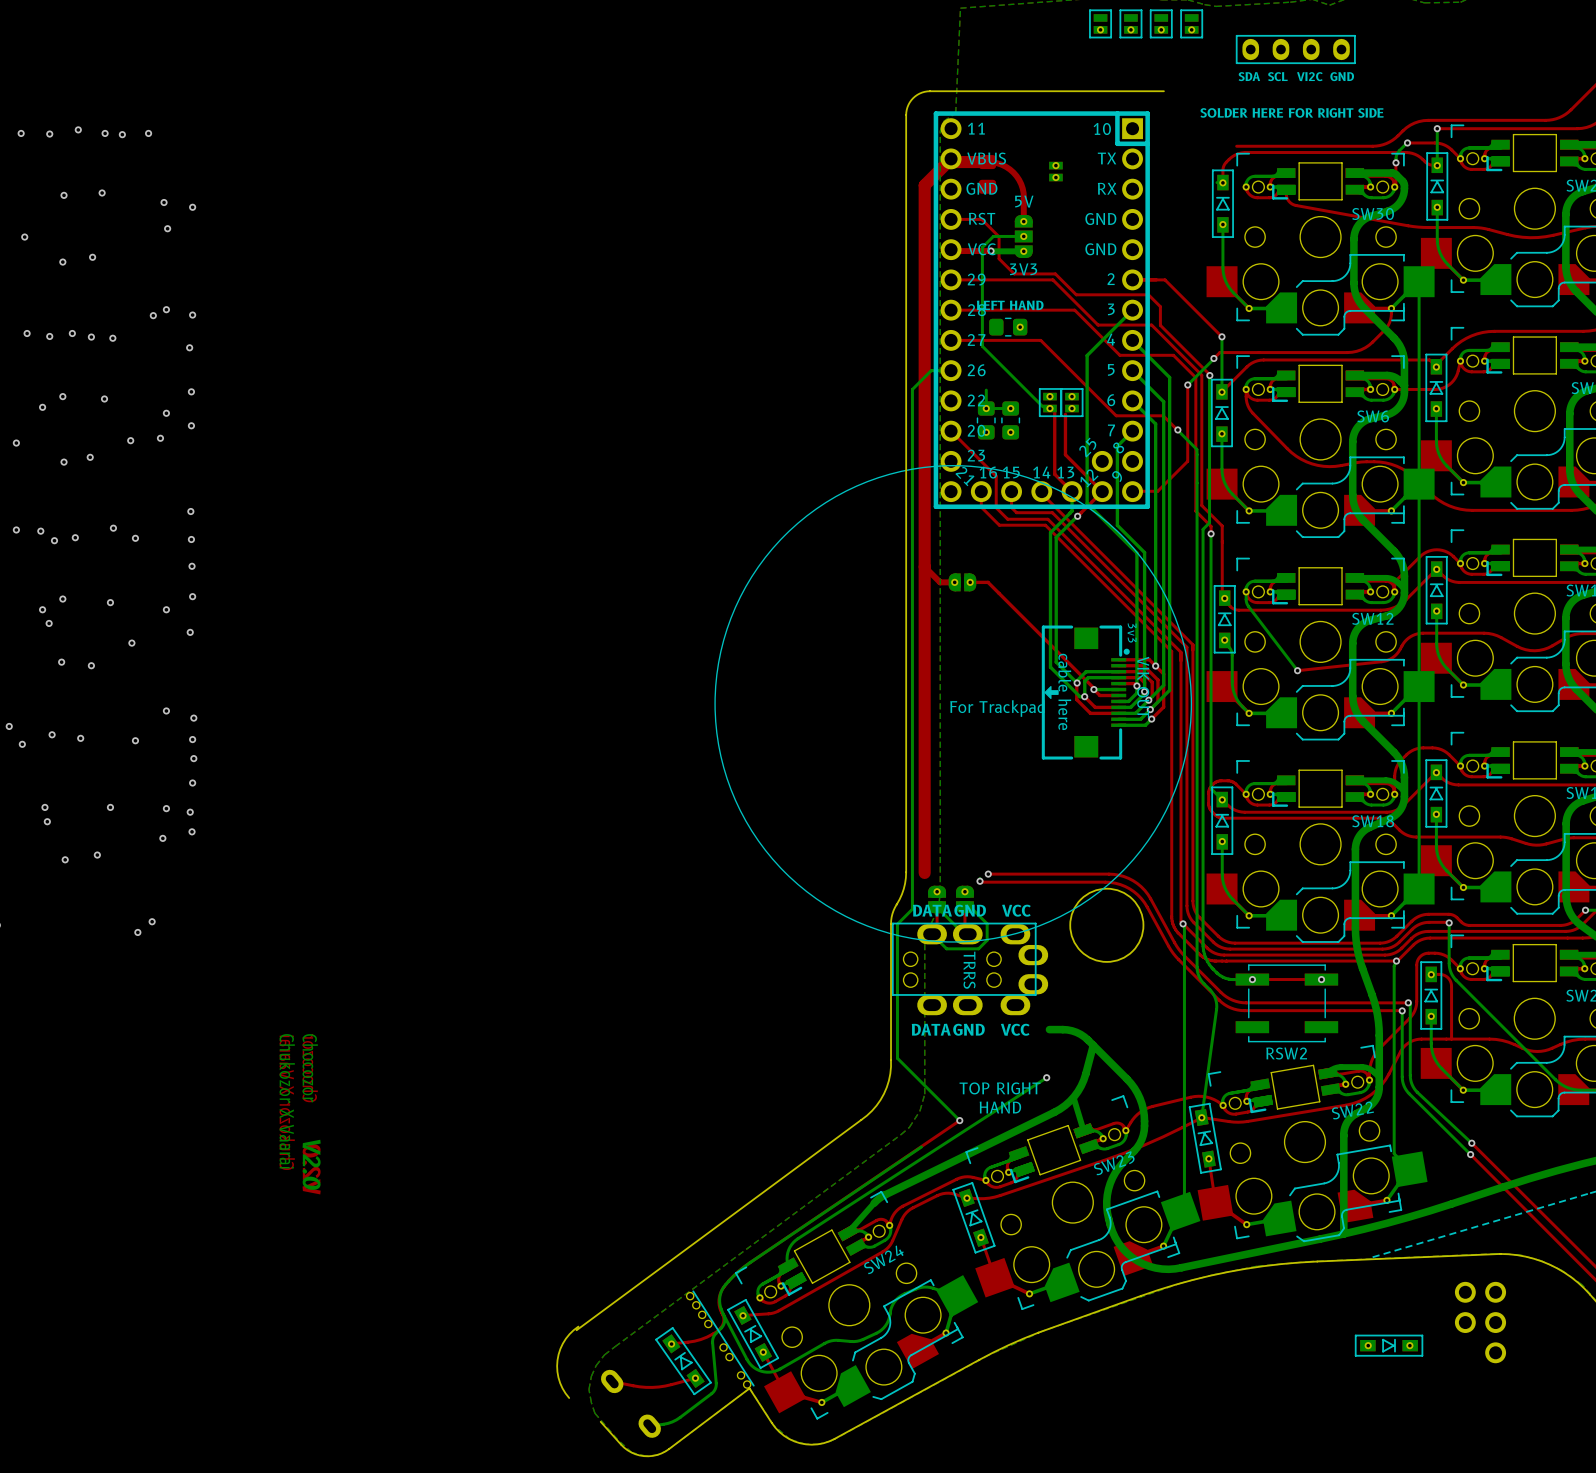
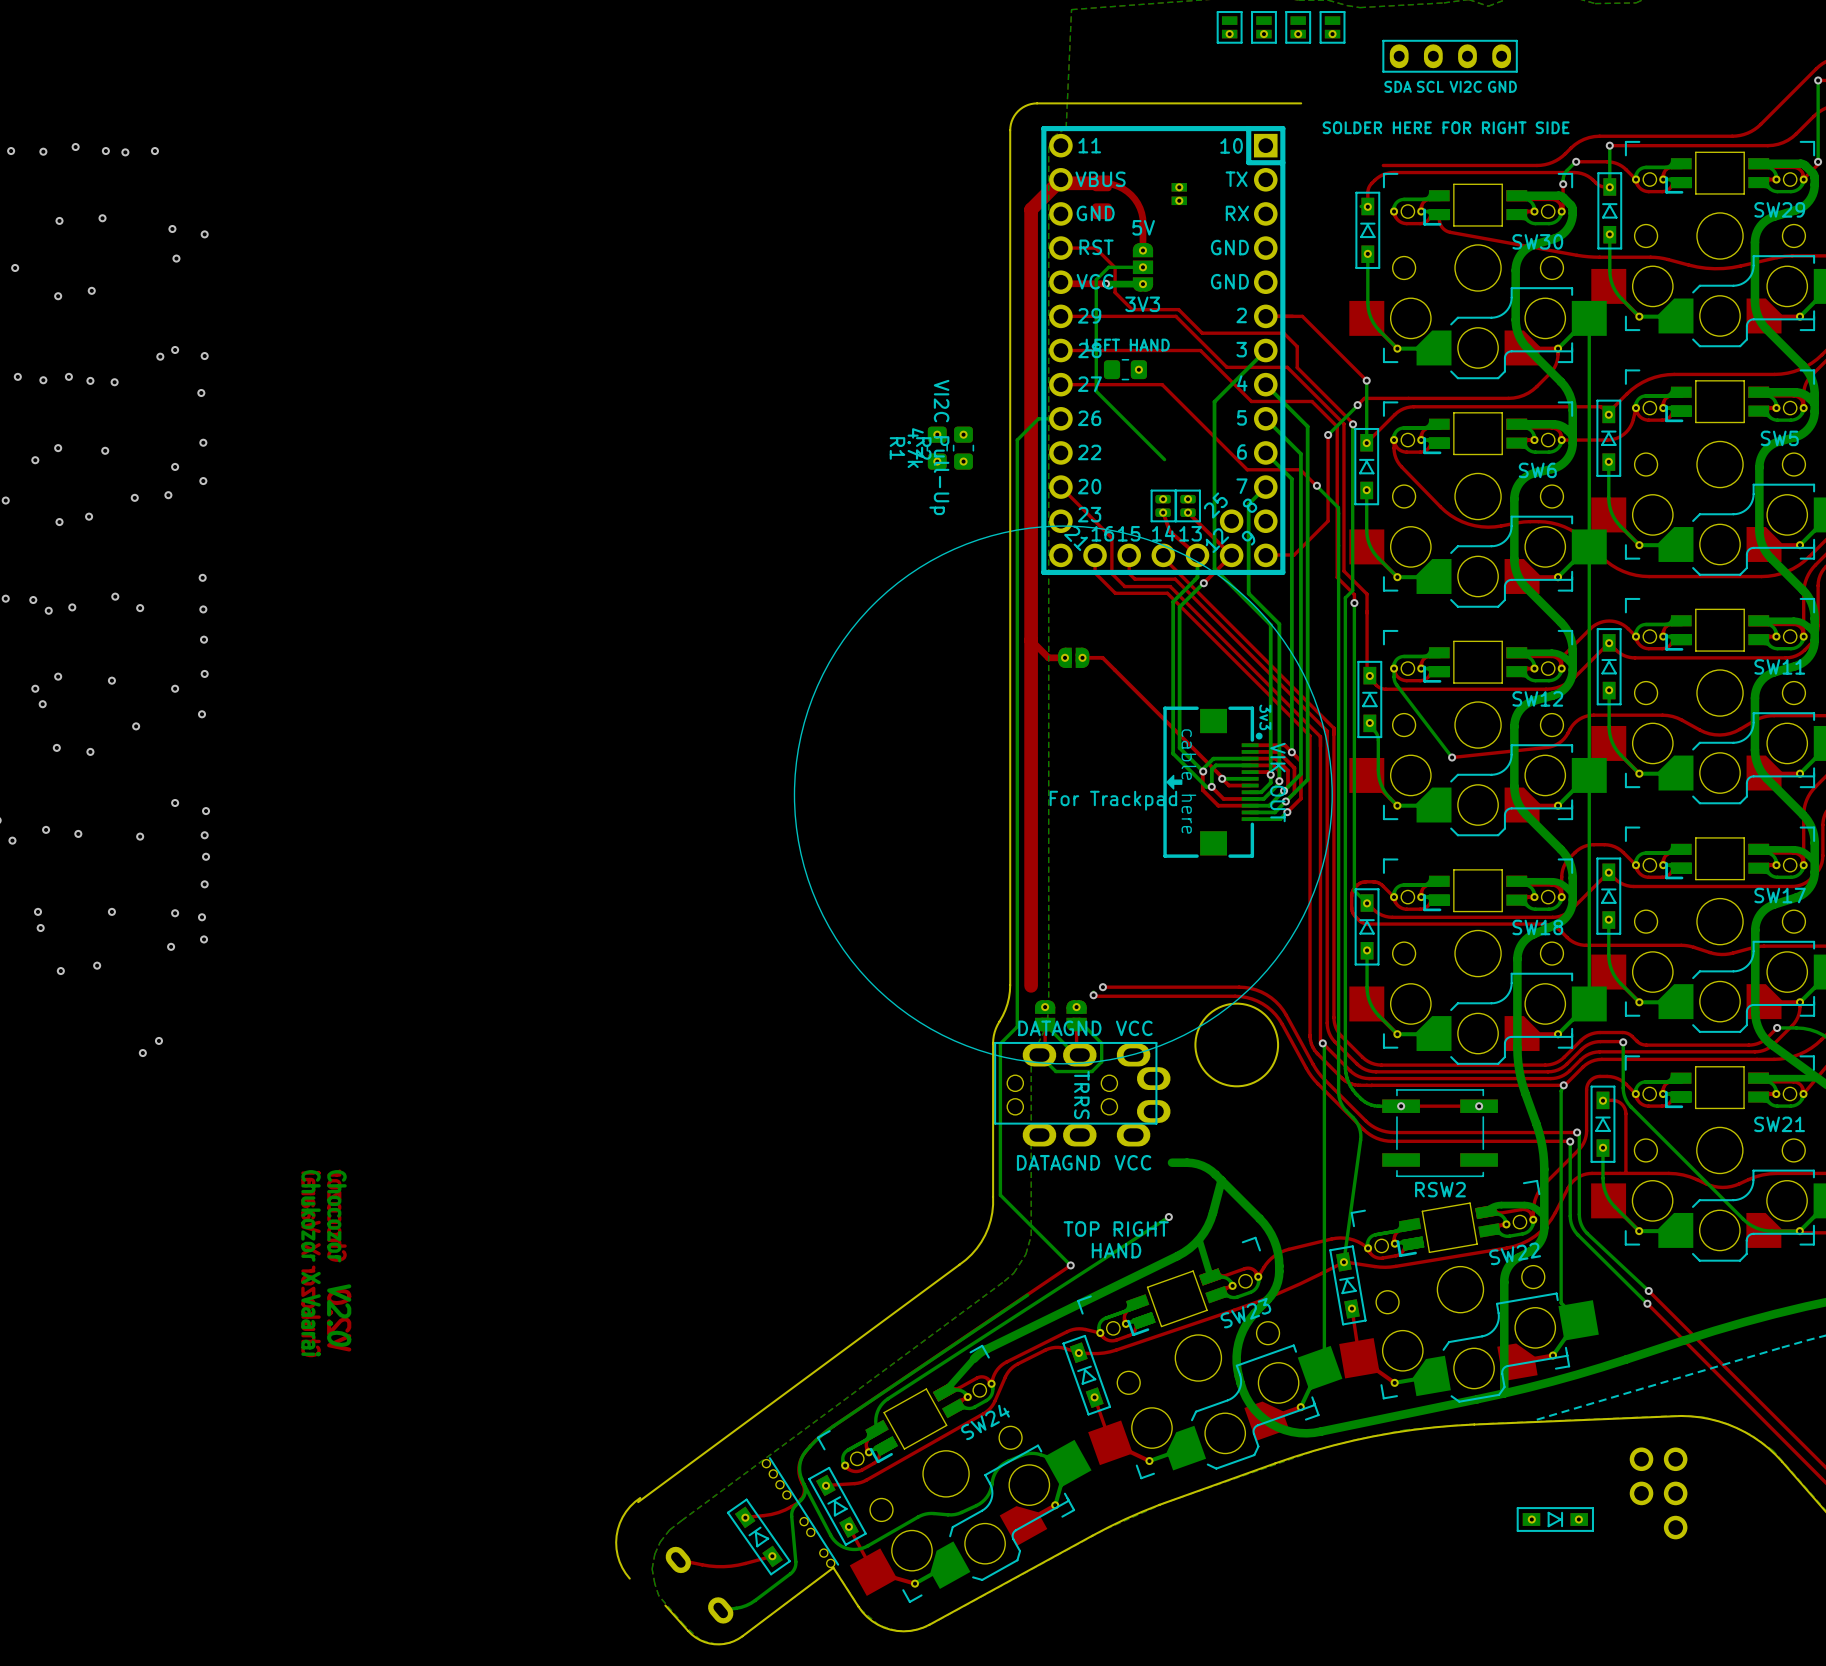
bottom track: (986, 390) (986, 408) (1008, 408) -> none
part: none -> (937, 448)
part: none -> (963, 448)
part: (1061, 402) -> none
top track: (1054, 413) (1054, 474) (1072, 491) -> (1163, 512) (1169, 531) (1197, 555)
top track: (1065, 414) (1065, 454) (1102, 491) -> (1188, 512) (1231, 555)
part: (986, 420) -> none
part: (1010, 420) -> none
part: none -> (1175, 505)

